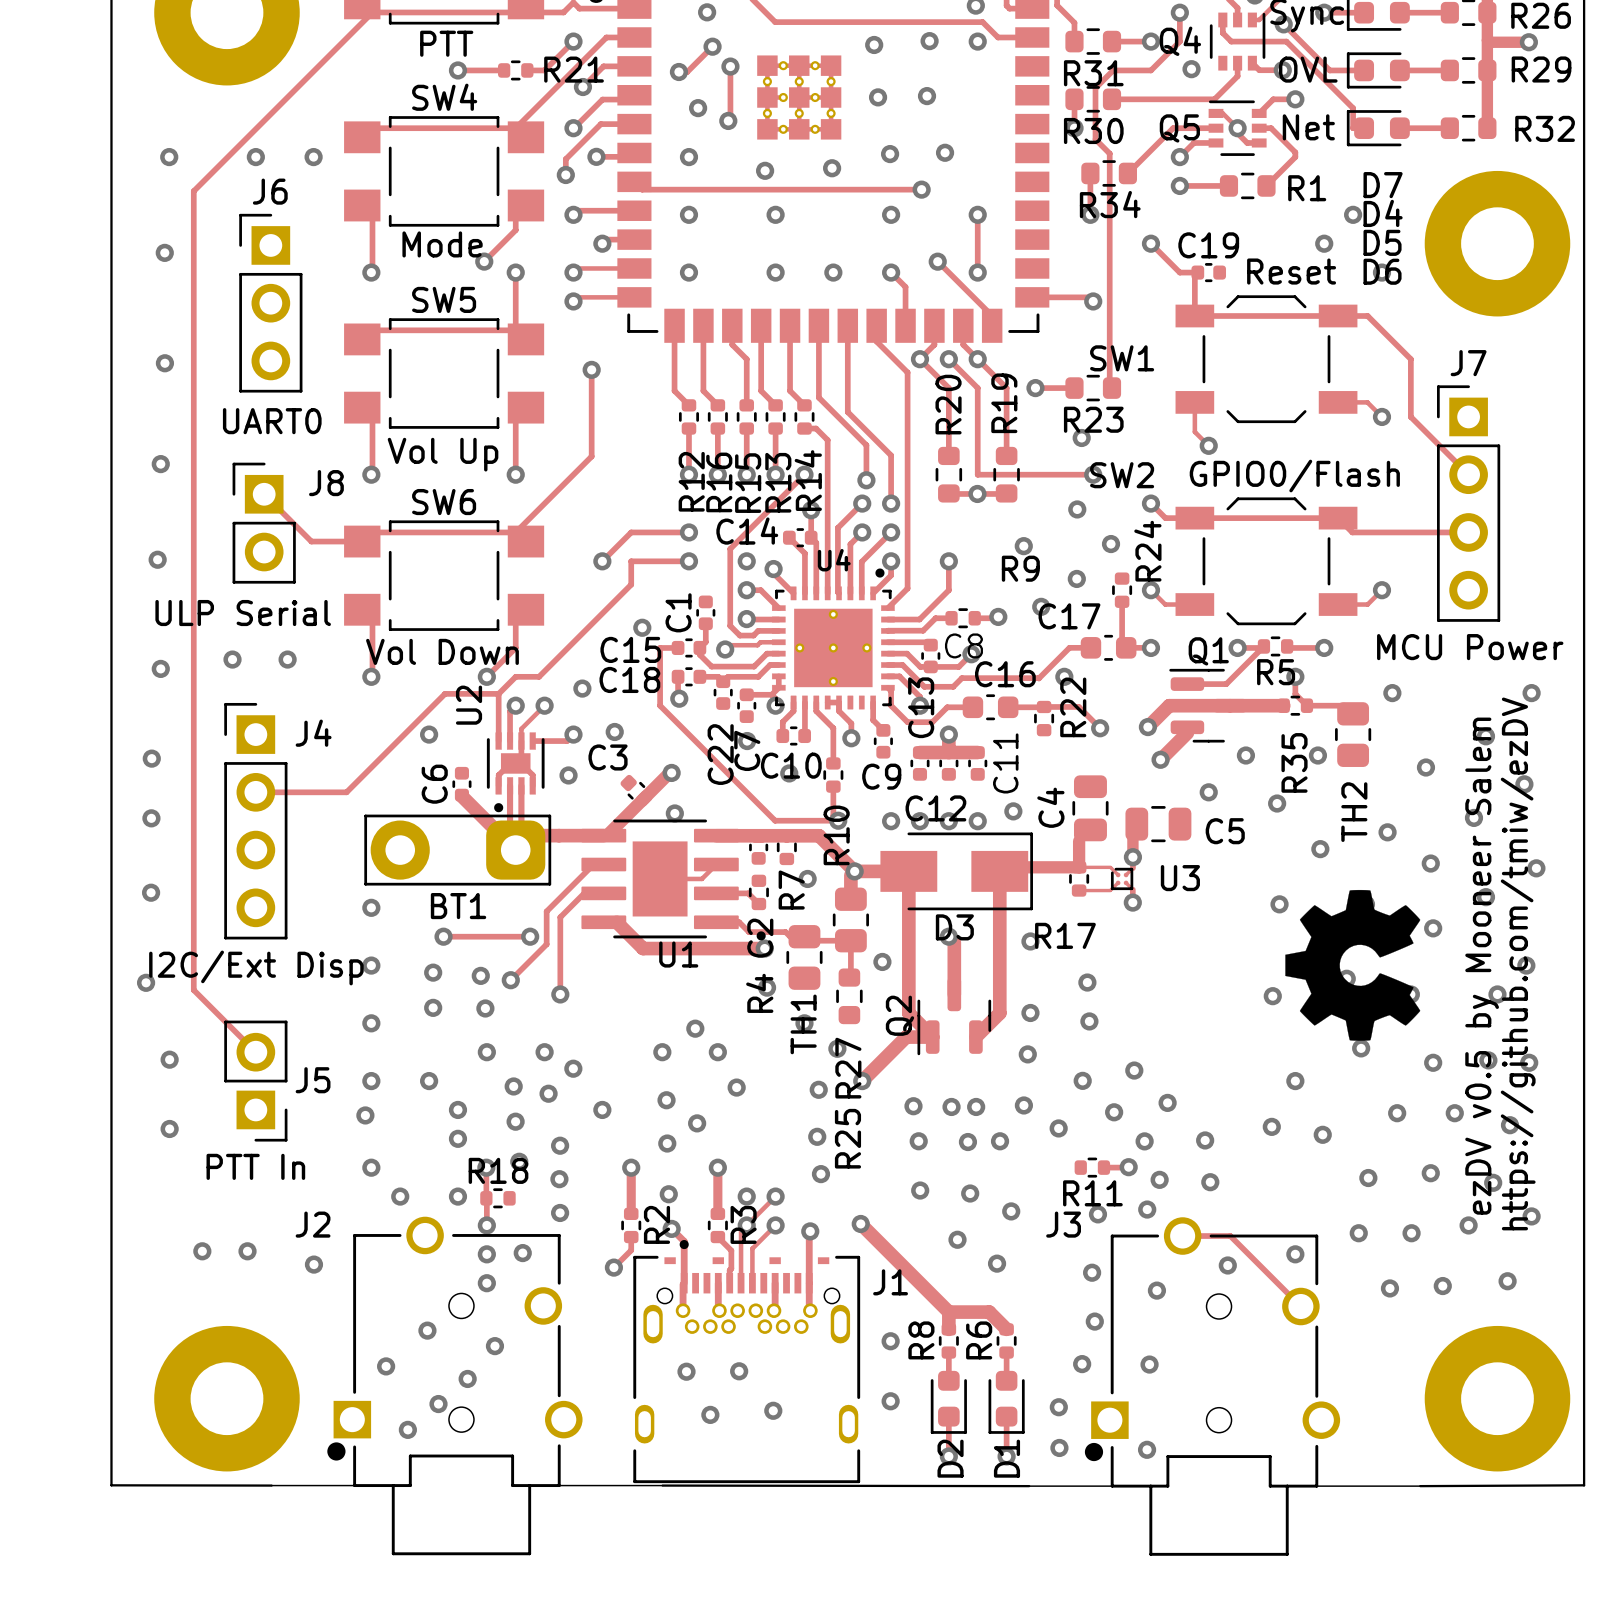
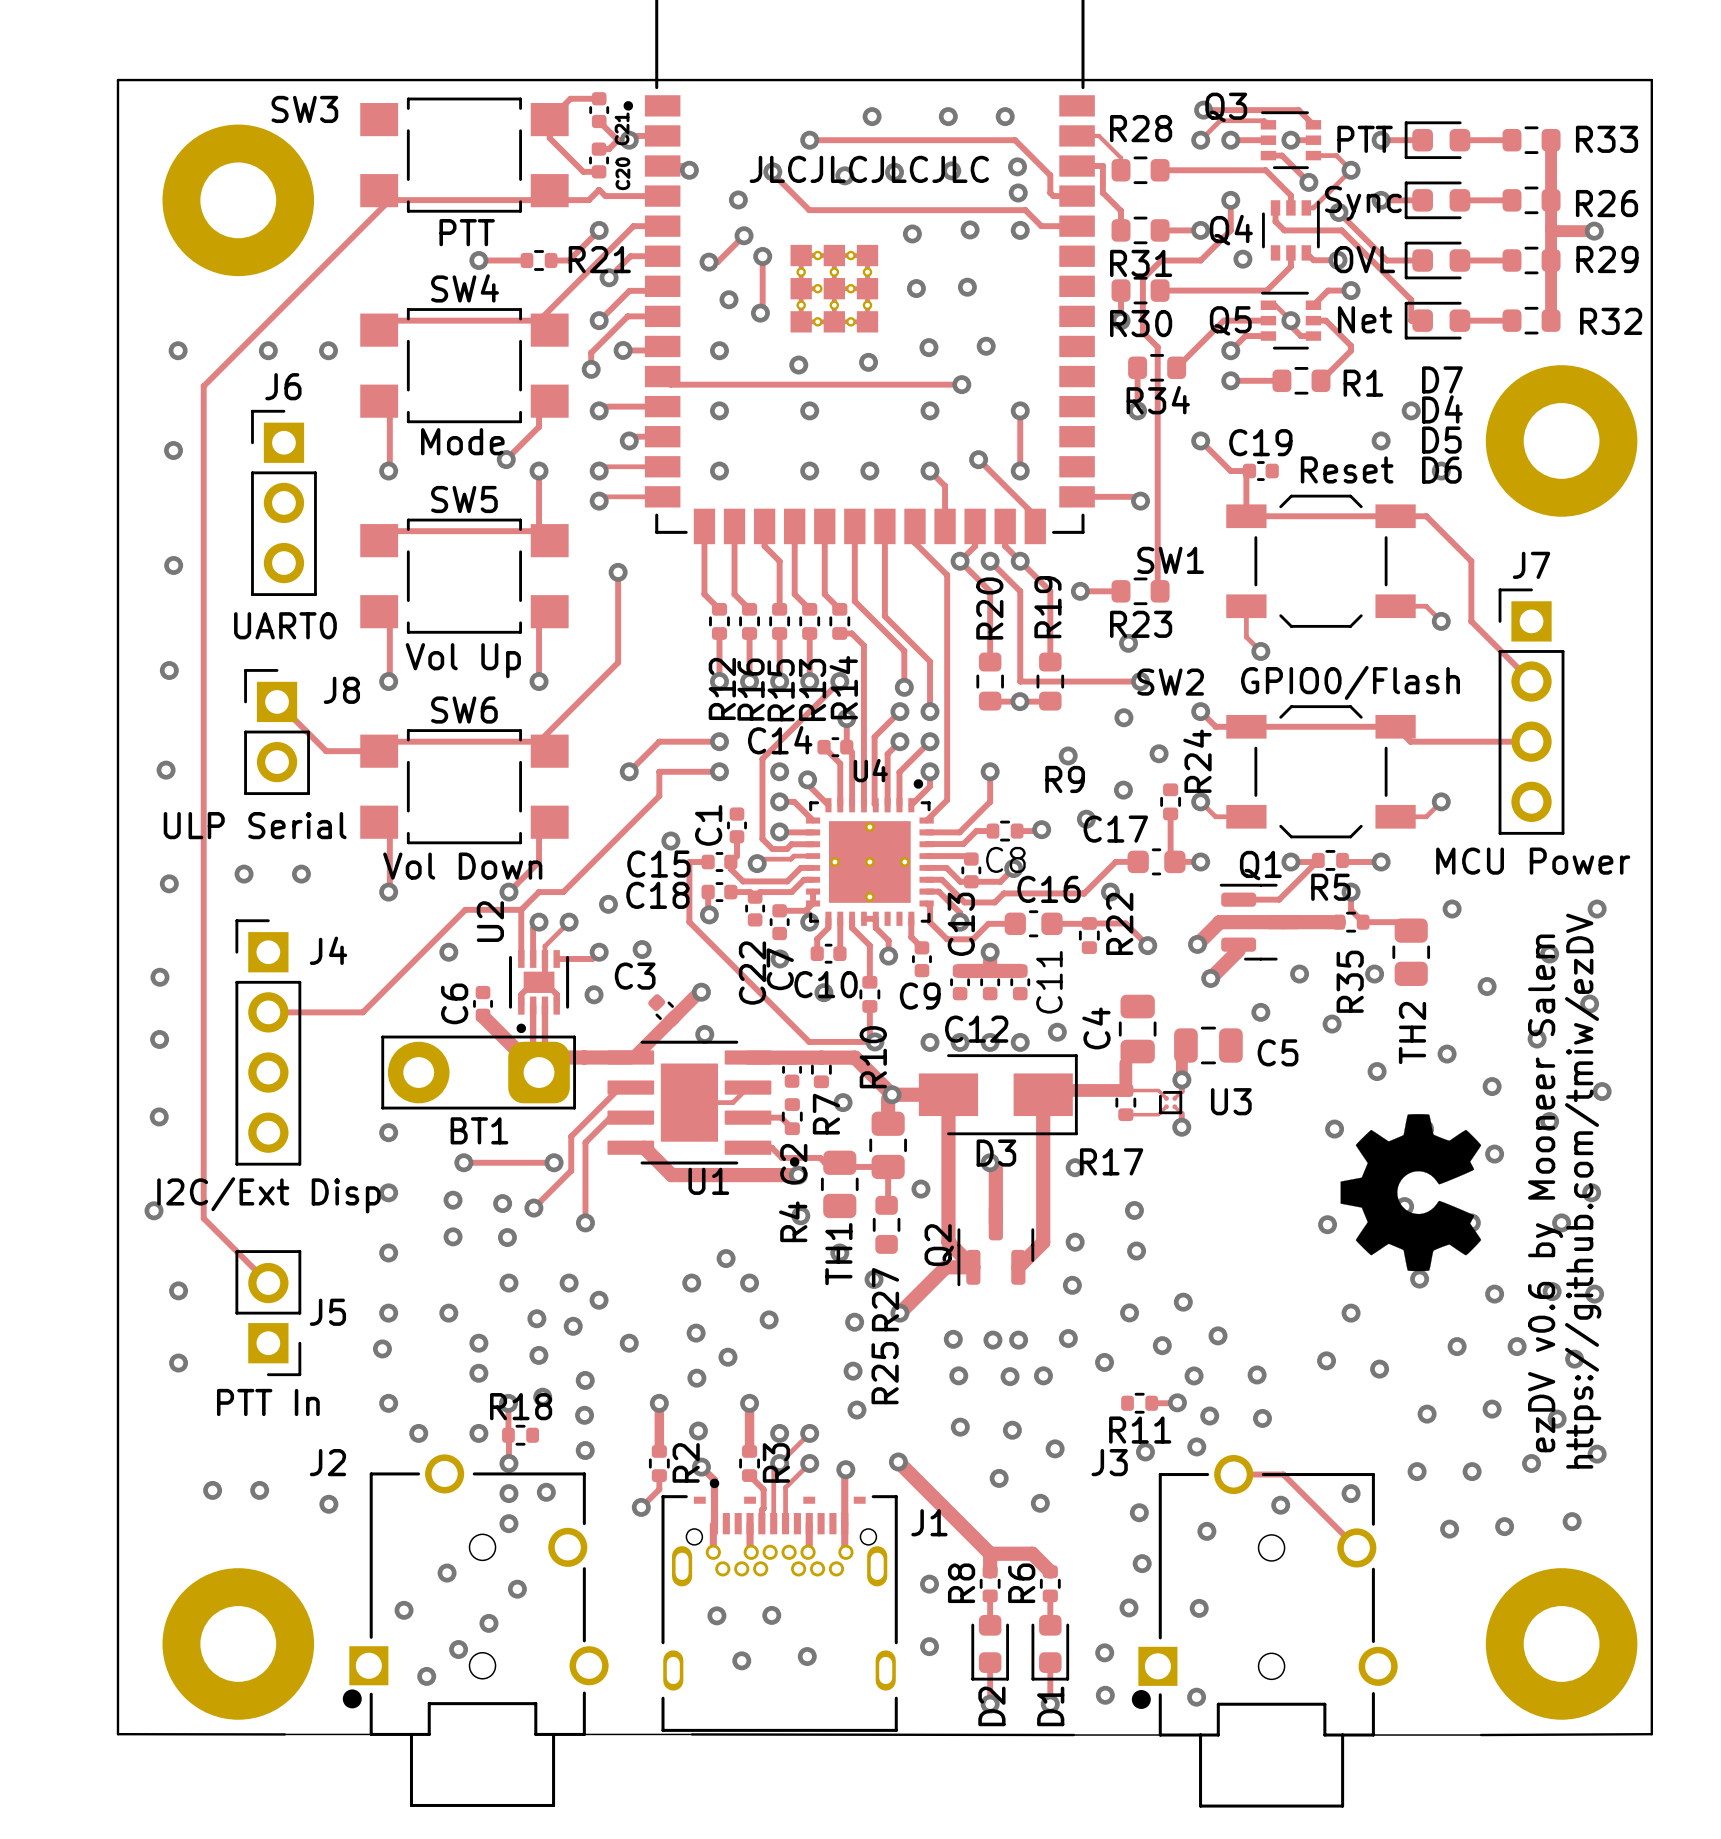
text: ezDV v0.5 by Mooneer Salem (1482, 966) -> ezDV v0.6 by Mooneer Salem (1545, 1193)

